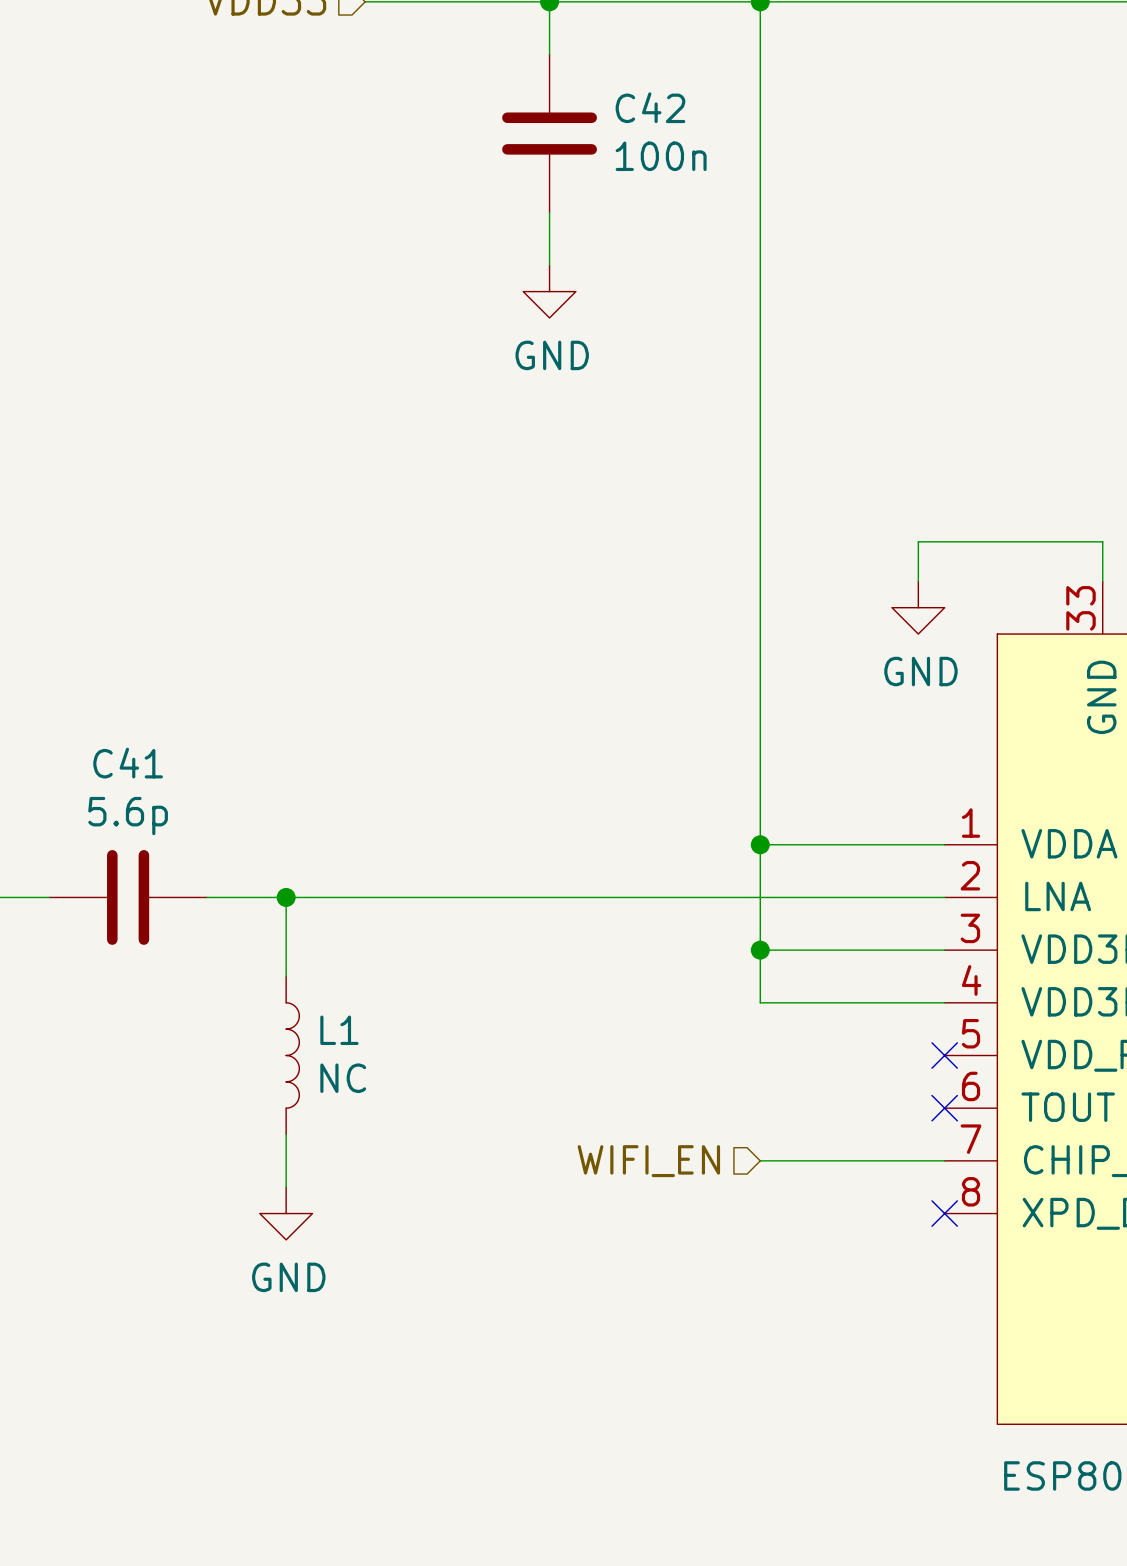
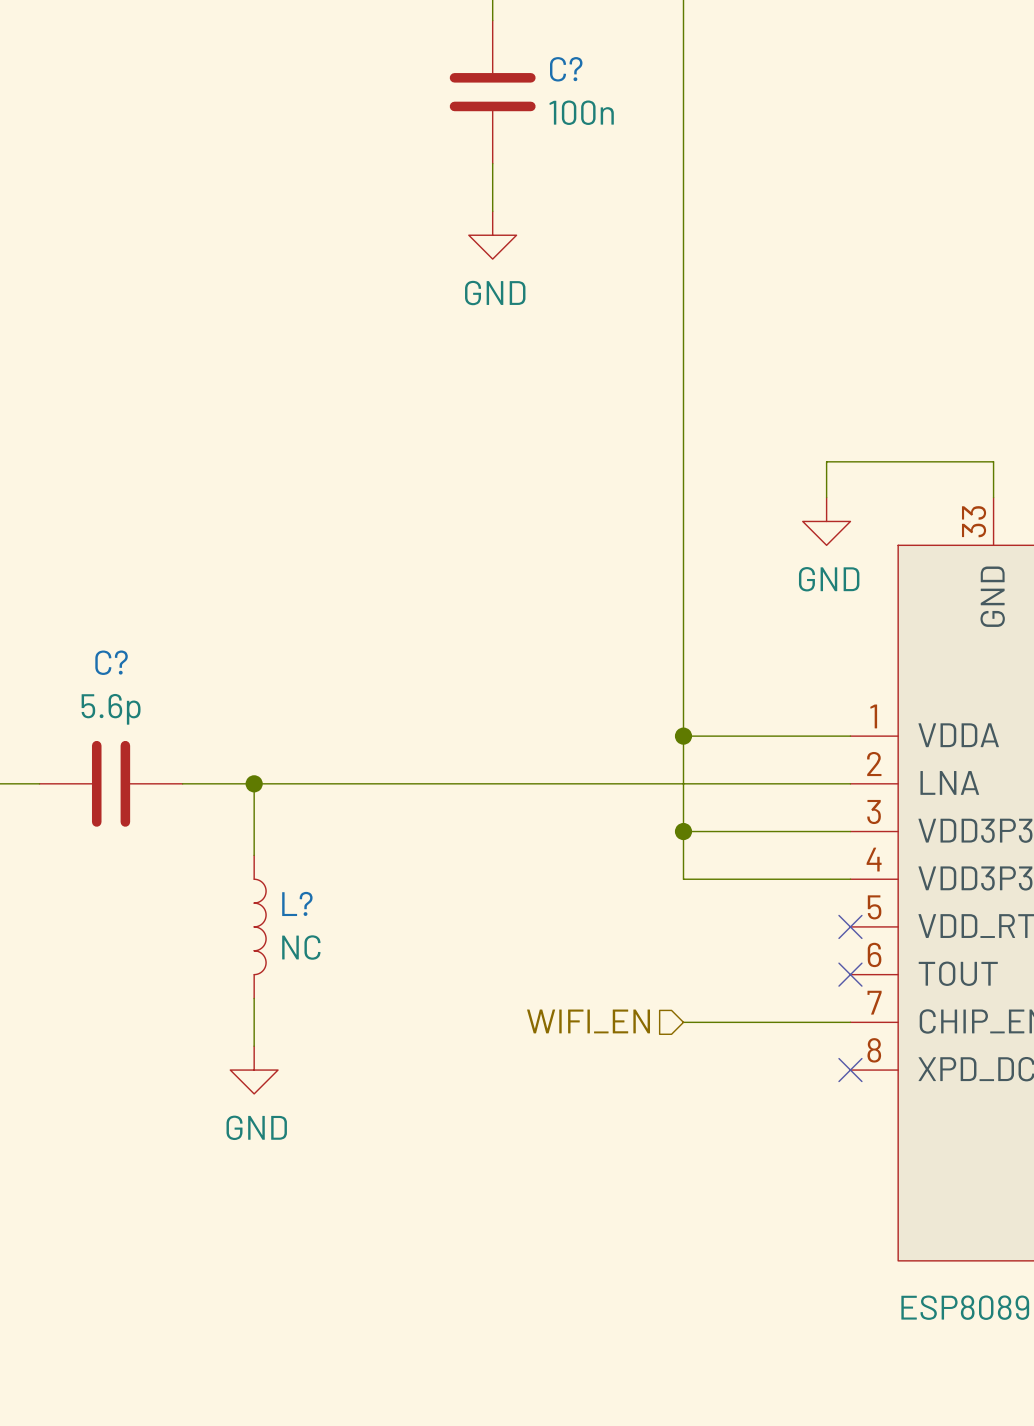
C42 name: C42 (650, 107) -> C? (566, 69)
C41 name: C41 (128, 763) -> C? (111, 662)
L1 name: L1 (339, 1030) -> L? (297, 903)

